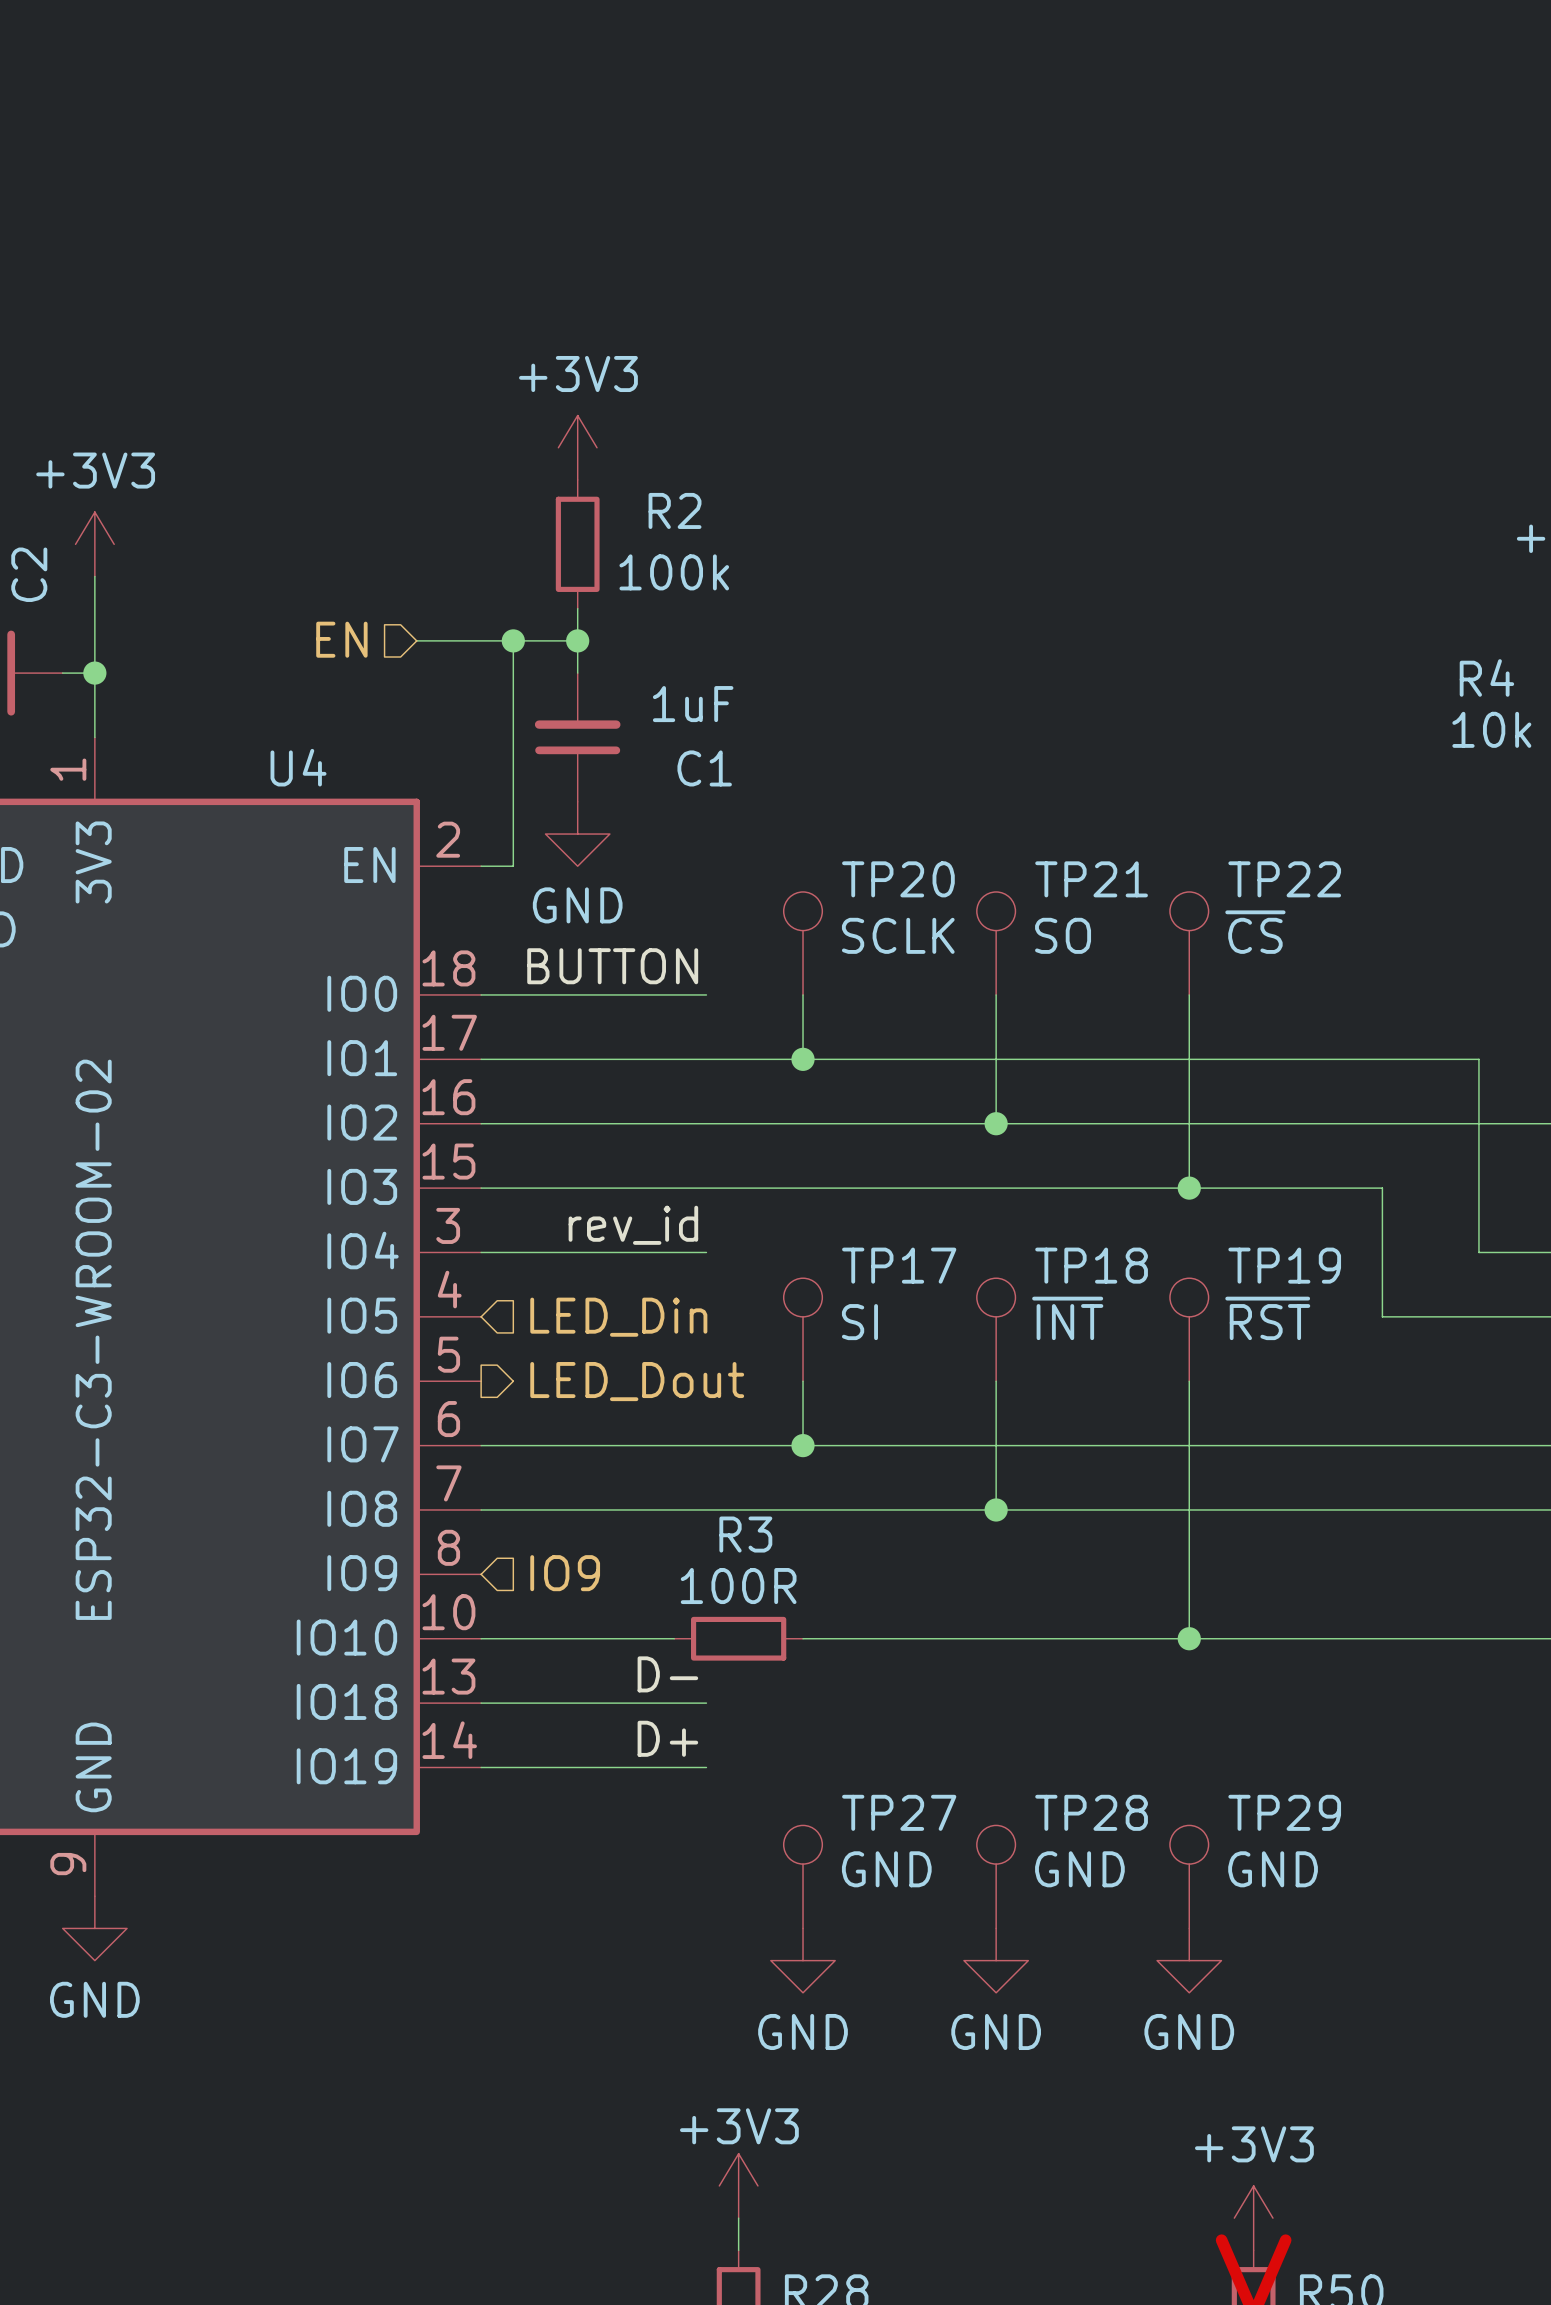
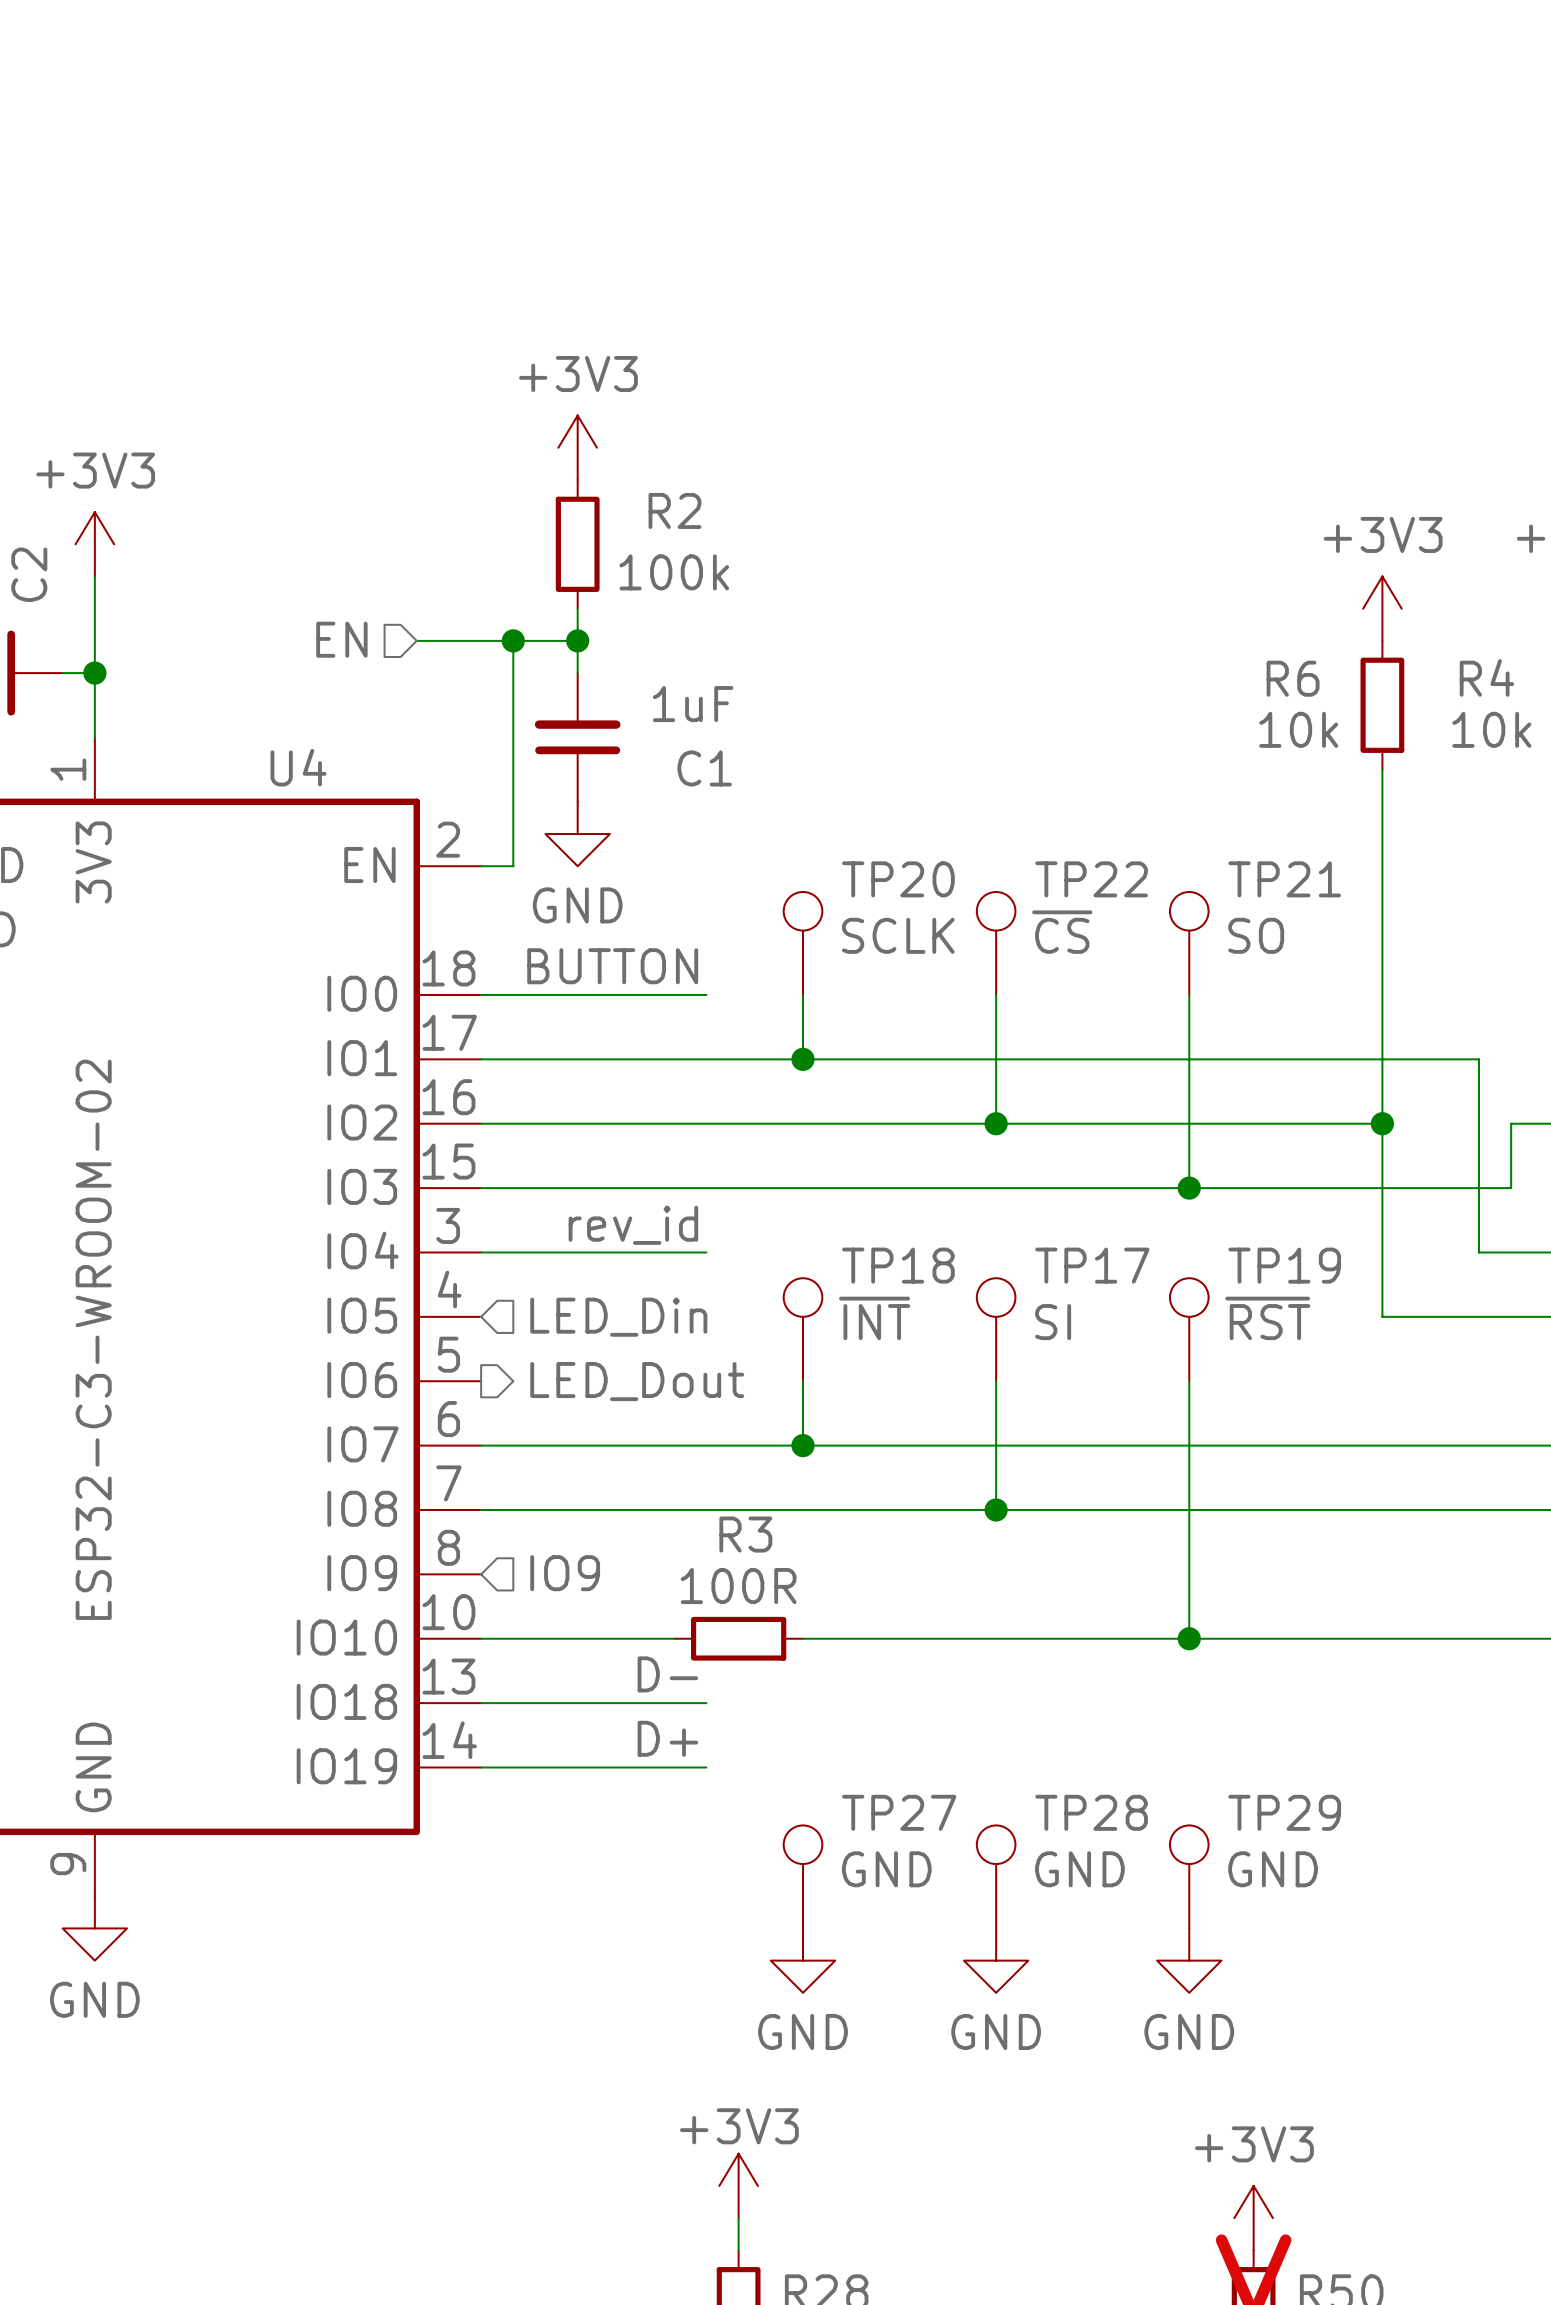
power symbol: none -> +3V3 (1382, 608)
R6: none -> 10k (1382, 705)
TP21 name: TP21 (1091, 879) -> TP22 (1091, 879)
TP22 name: TP22 (1284, 879) -> TP21 (1284, 879)
TP22 value: ~{CS} (1255, 932) -> SO (1256, 935)
TP21 value: SO (1063, 935) -> ~{CS} (1062, 932)
wire: (1382, 1123) (1511, 1123) -> (1382, 769) (1382, 1188) (1511, 1188) (1511, 1123)
junction: none -> (1382, 1123)
TP17 name: TP17 (899, 1265) -> TP18 (898, 1265)
TP18 name: TP18 (1091, 1265) -> TP17 (1092, 1265)
TP18 value: ~{INT} (1067, 1318) -> SI (1053, 1322)
TP17 value: SI (859, 1322) -> ~{INT} (874, 1318)

